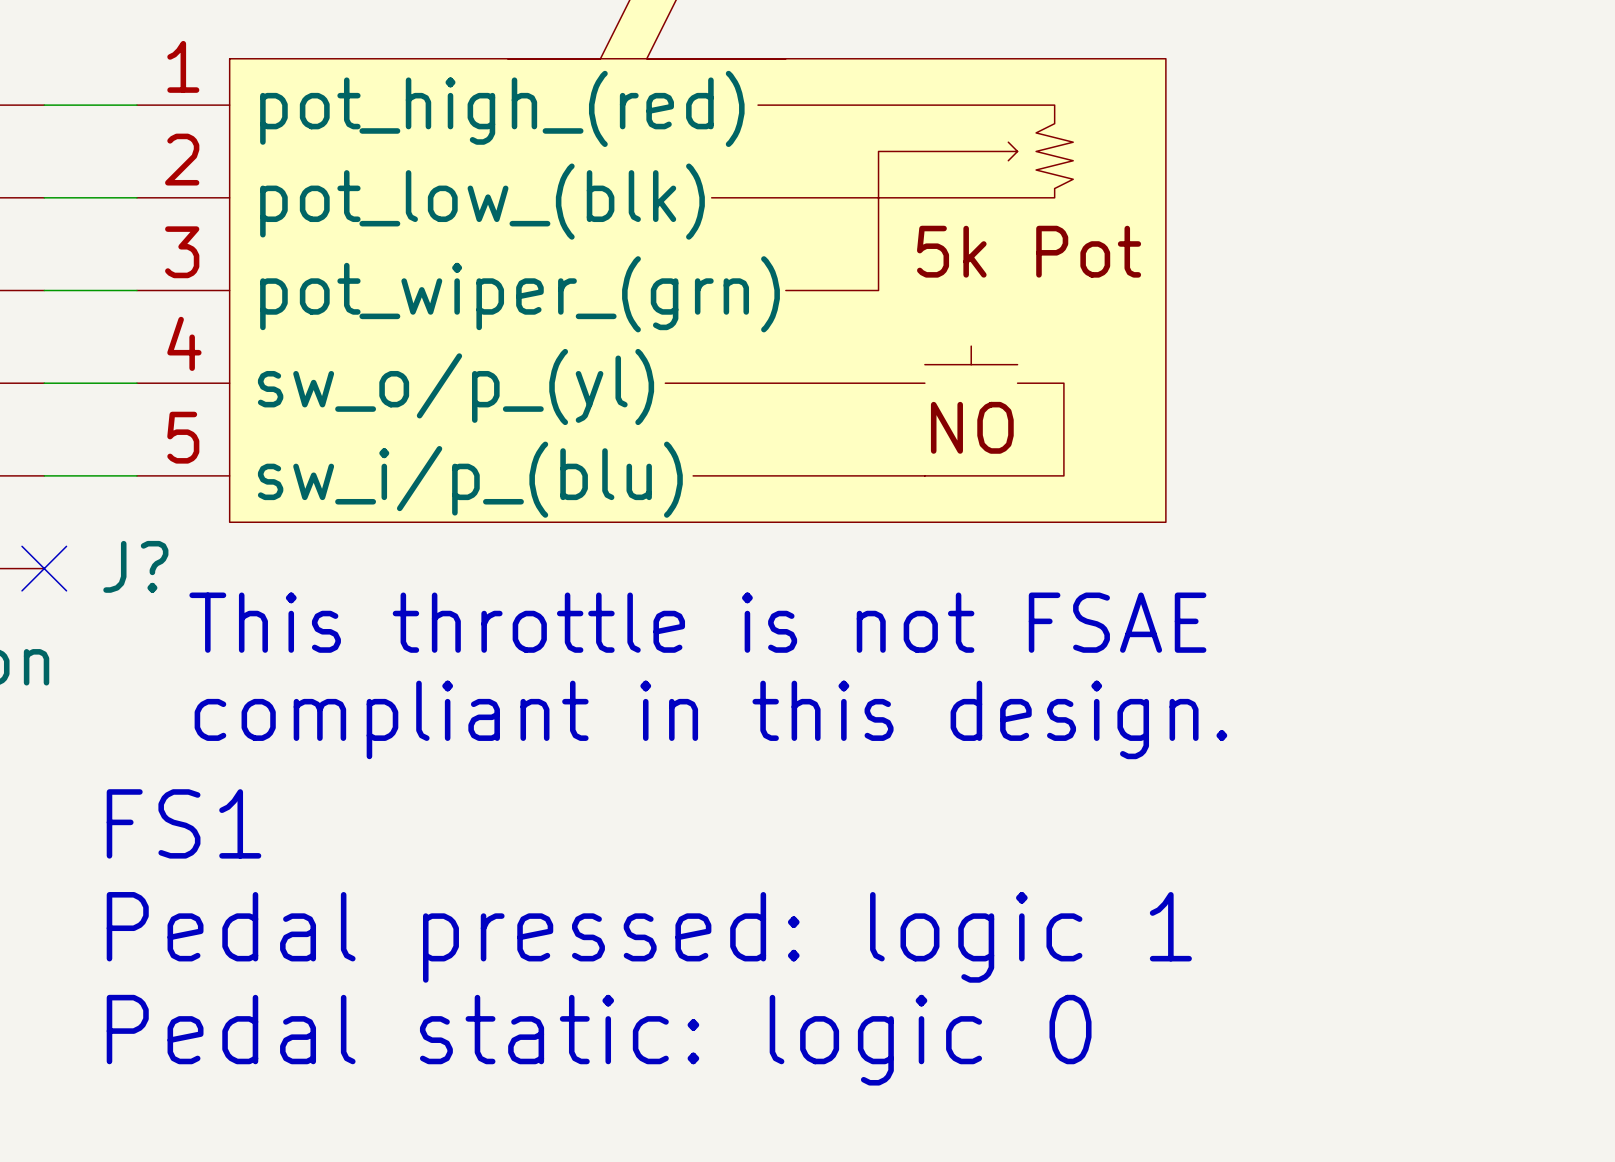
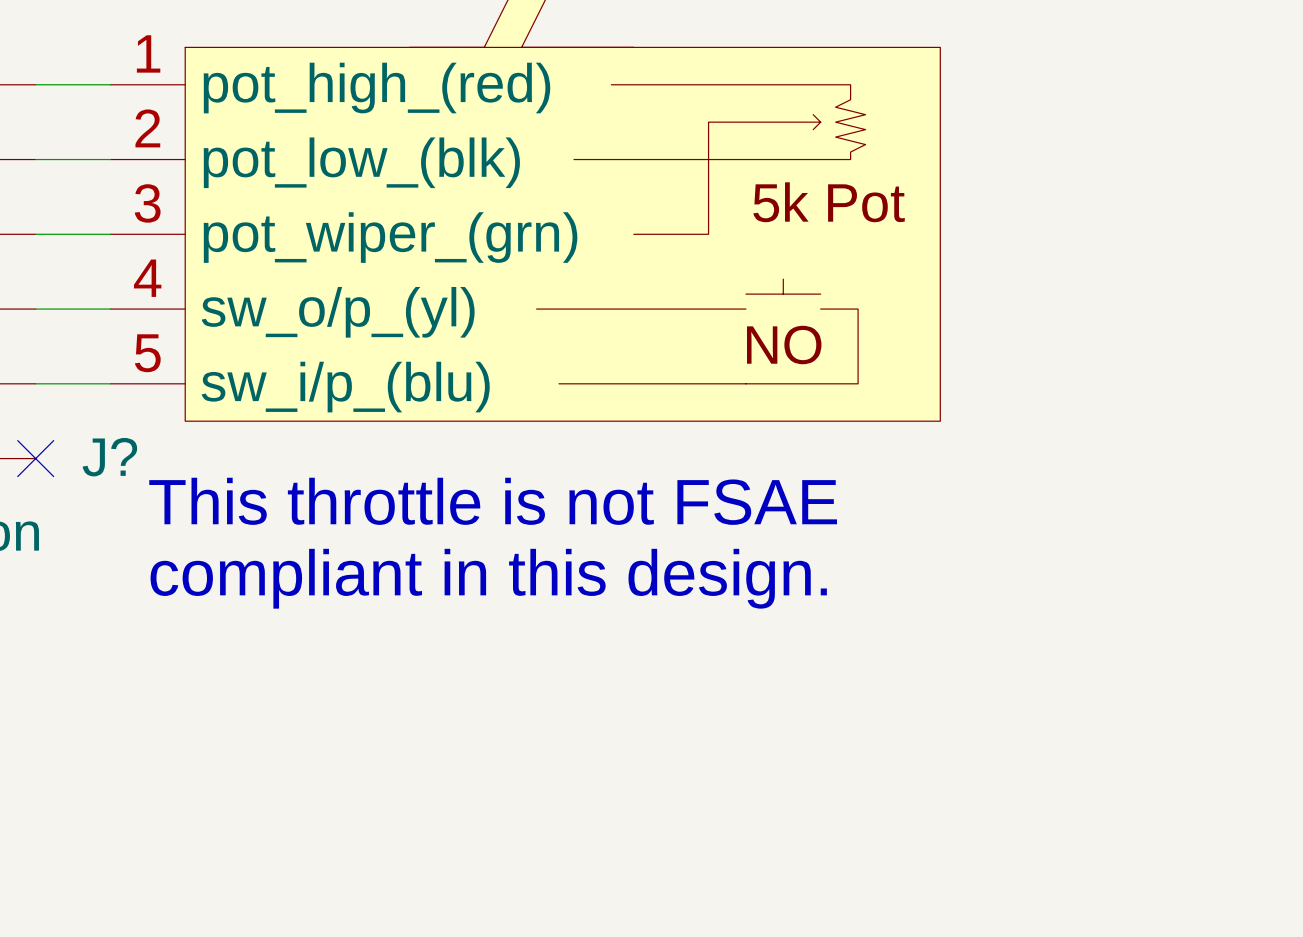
text: FS1 (183, 823) -> none
text: Pedal pressed: logic 1 (649, 937) -> none
text: Pedal static: logic 0 (599, 1040) -> none

